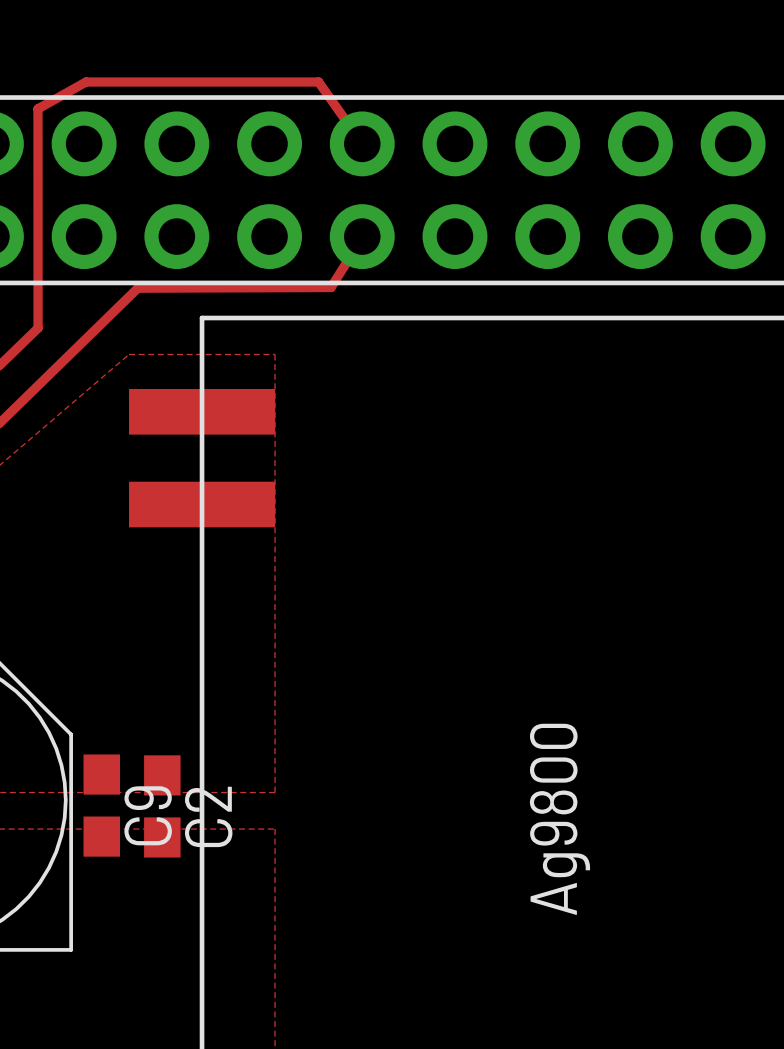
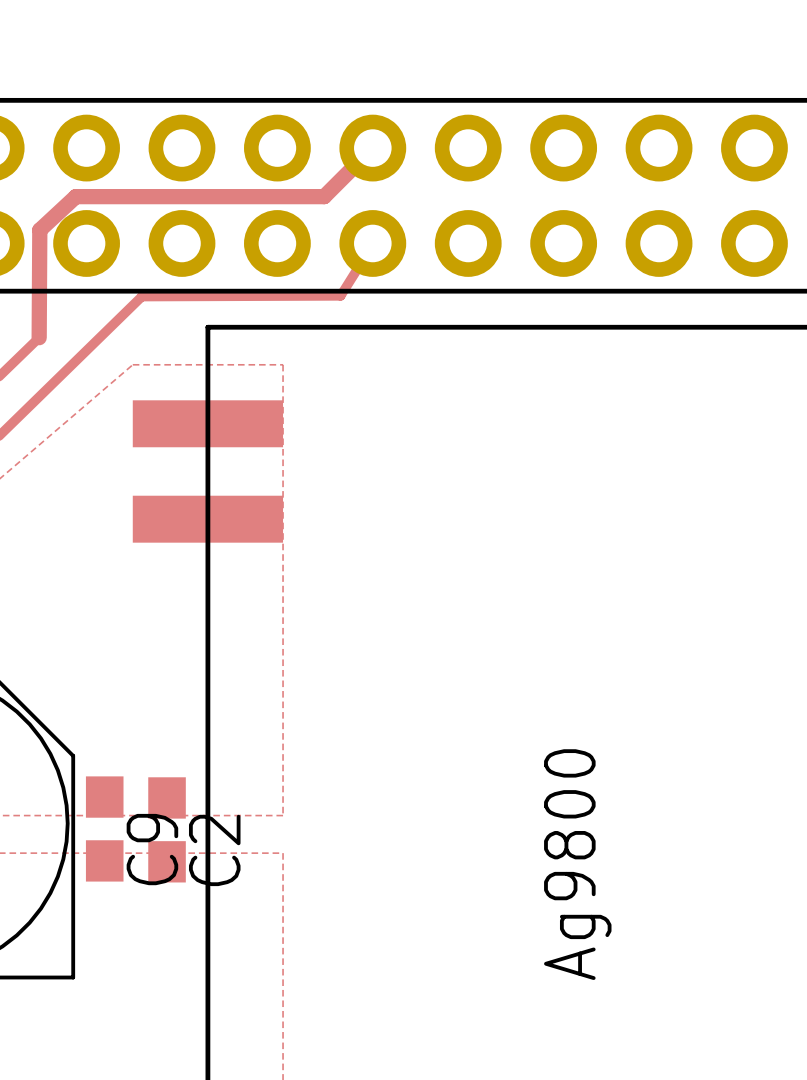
track: (362, 143) (318, 82) (86, 82) (37, 108) (38, 328) -> (372, 148) (324, 196) (75, 196) (39, 230) (39, 337)

